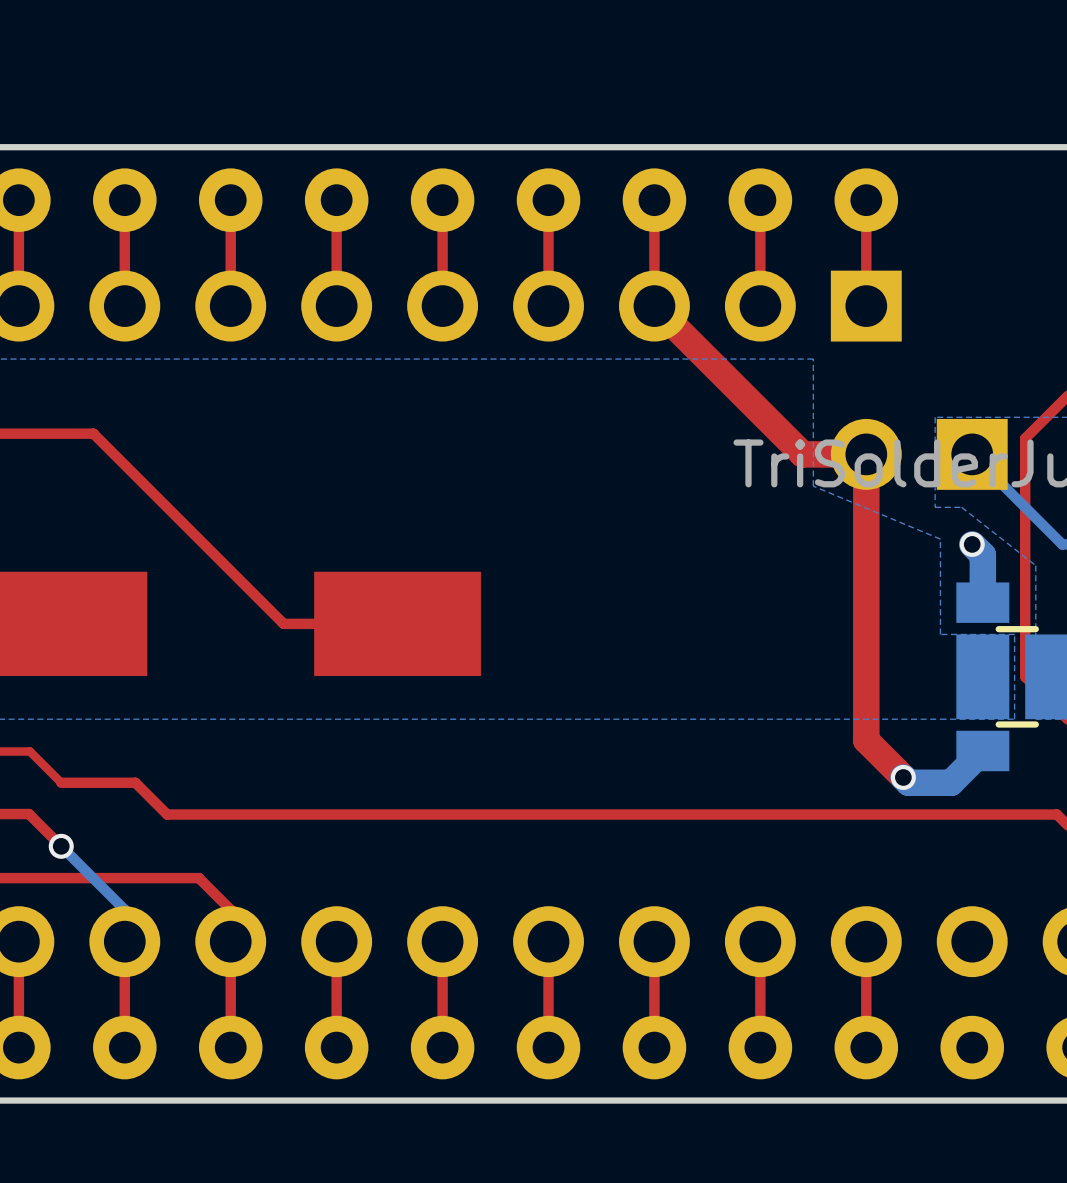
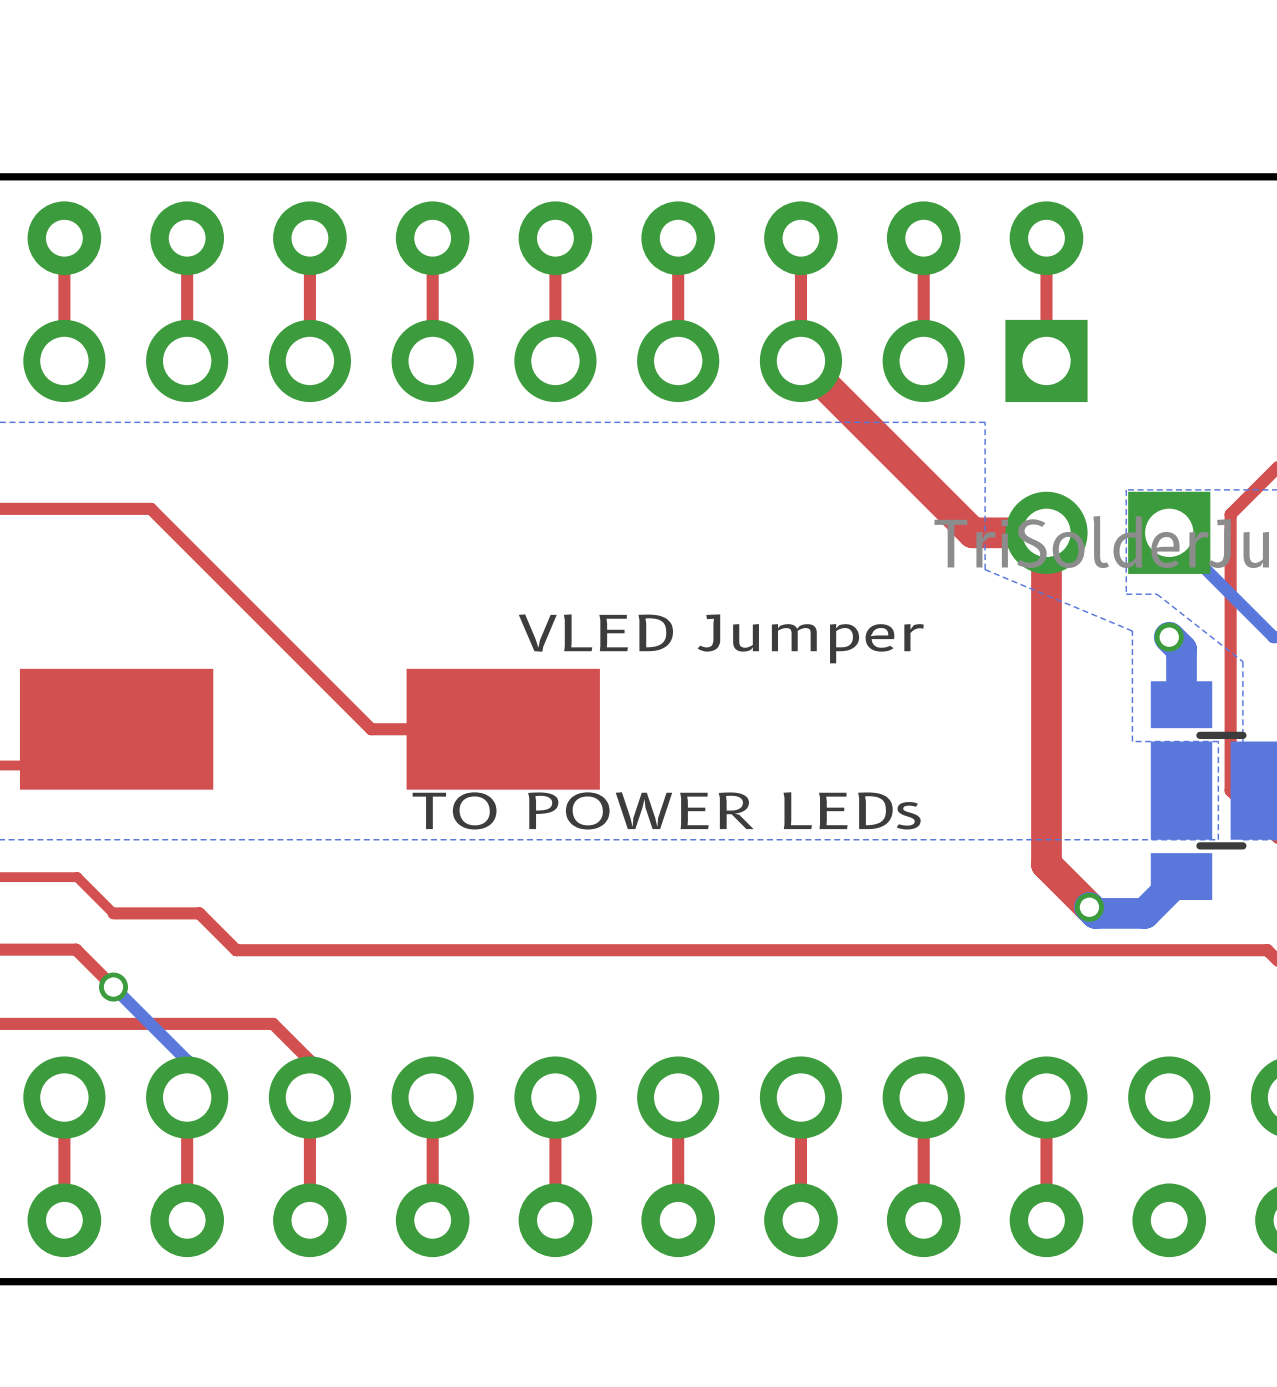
text: none -> VLED Jumper (721, 638)
text: none -> TO POWER LEDs (666, 810)

